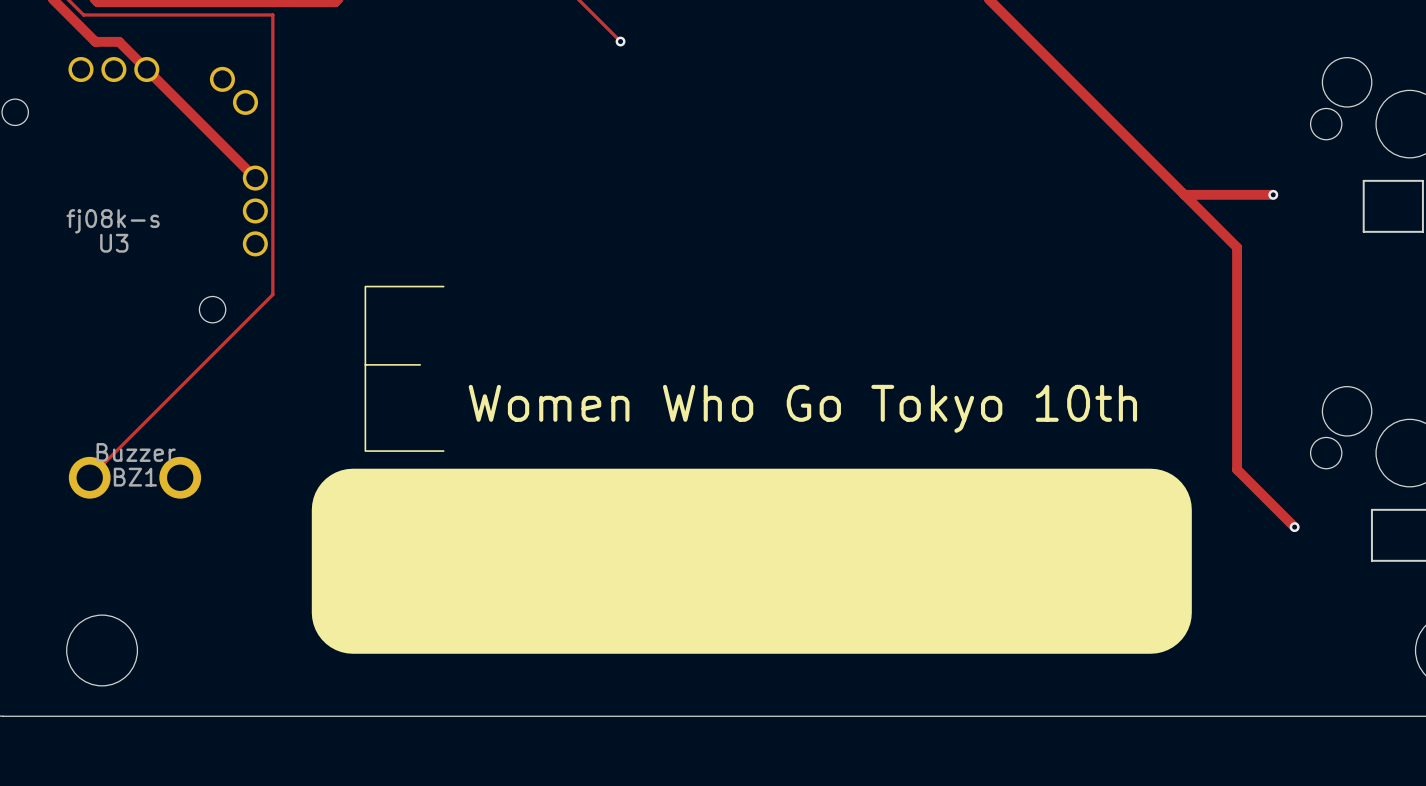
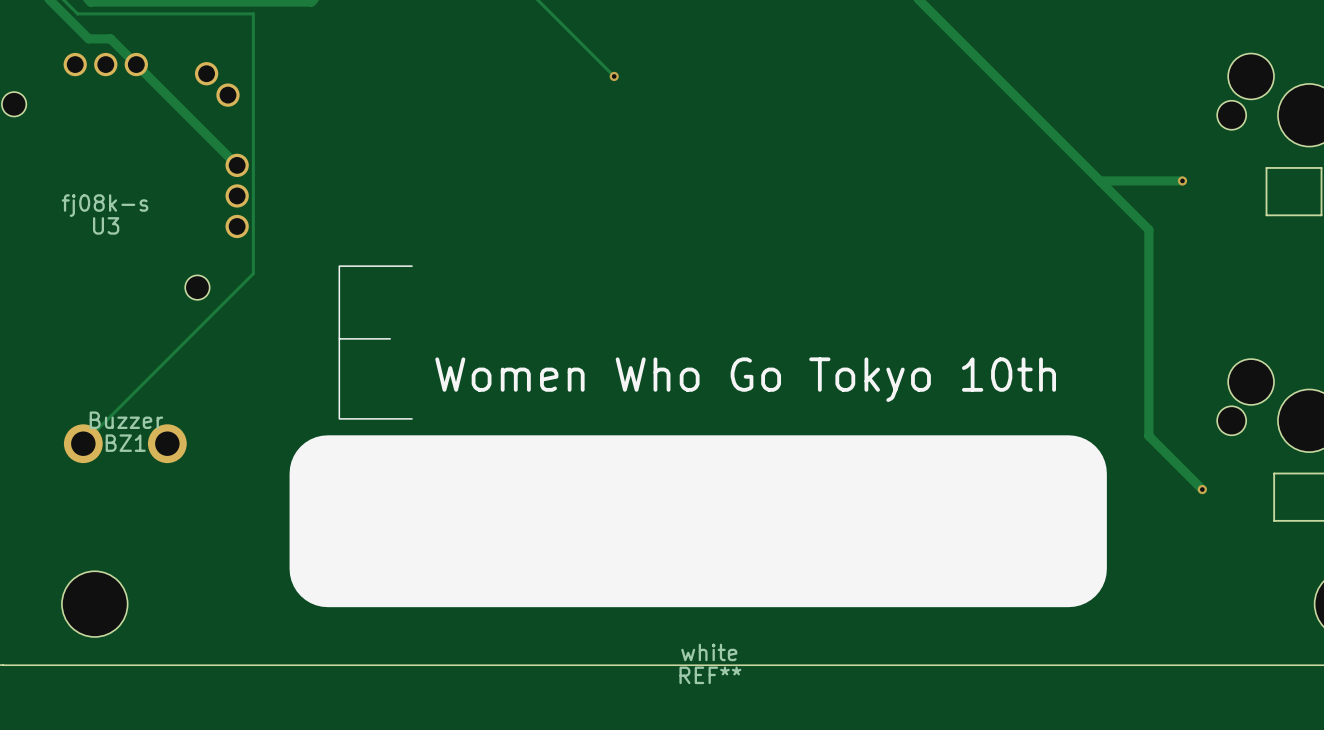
track: none -> (576, 38) (614, 76)
via position: (620, 41) -> (614, 76)
REF**: none -> white (698, 521)

